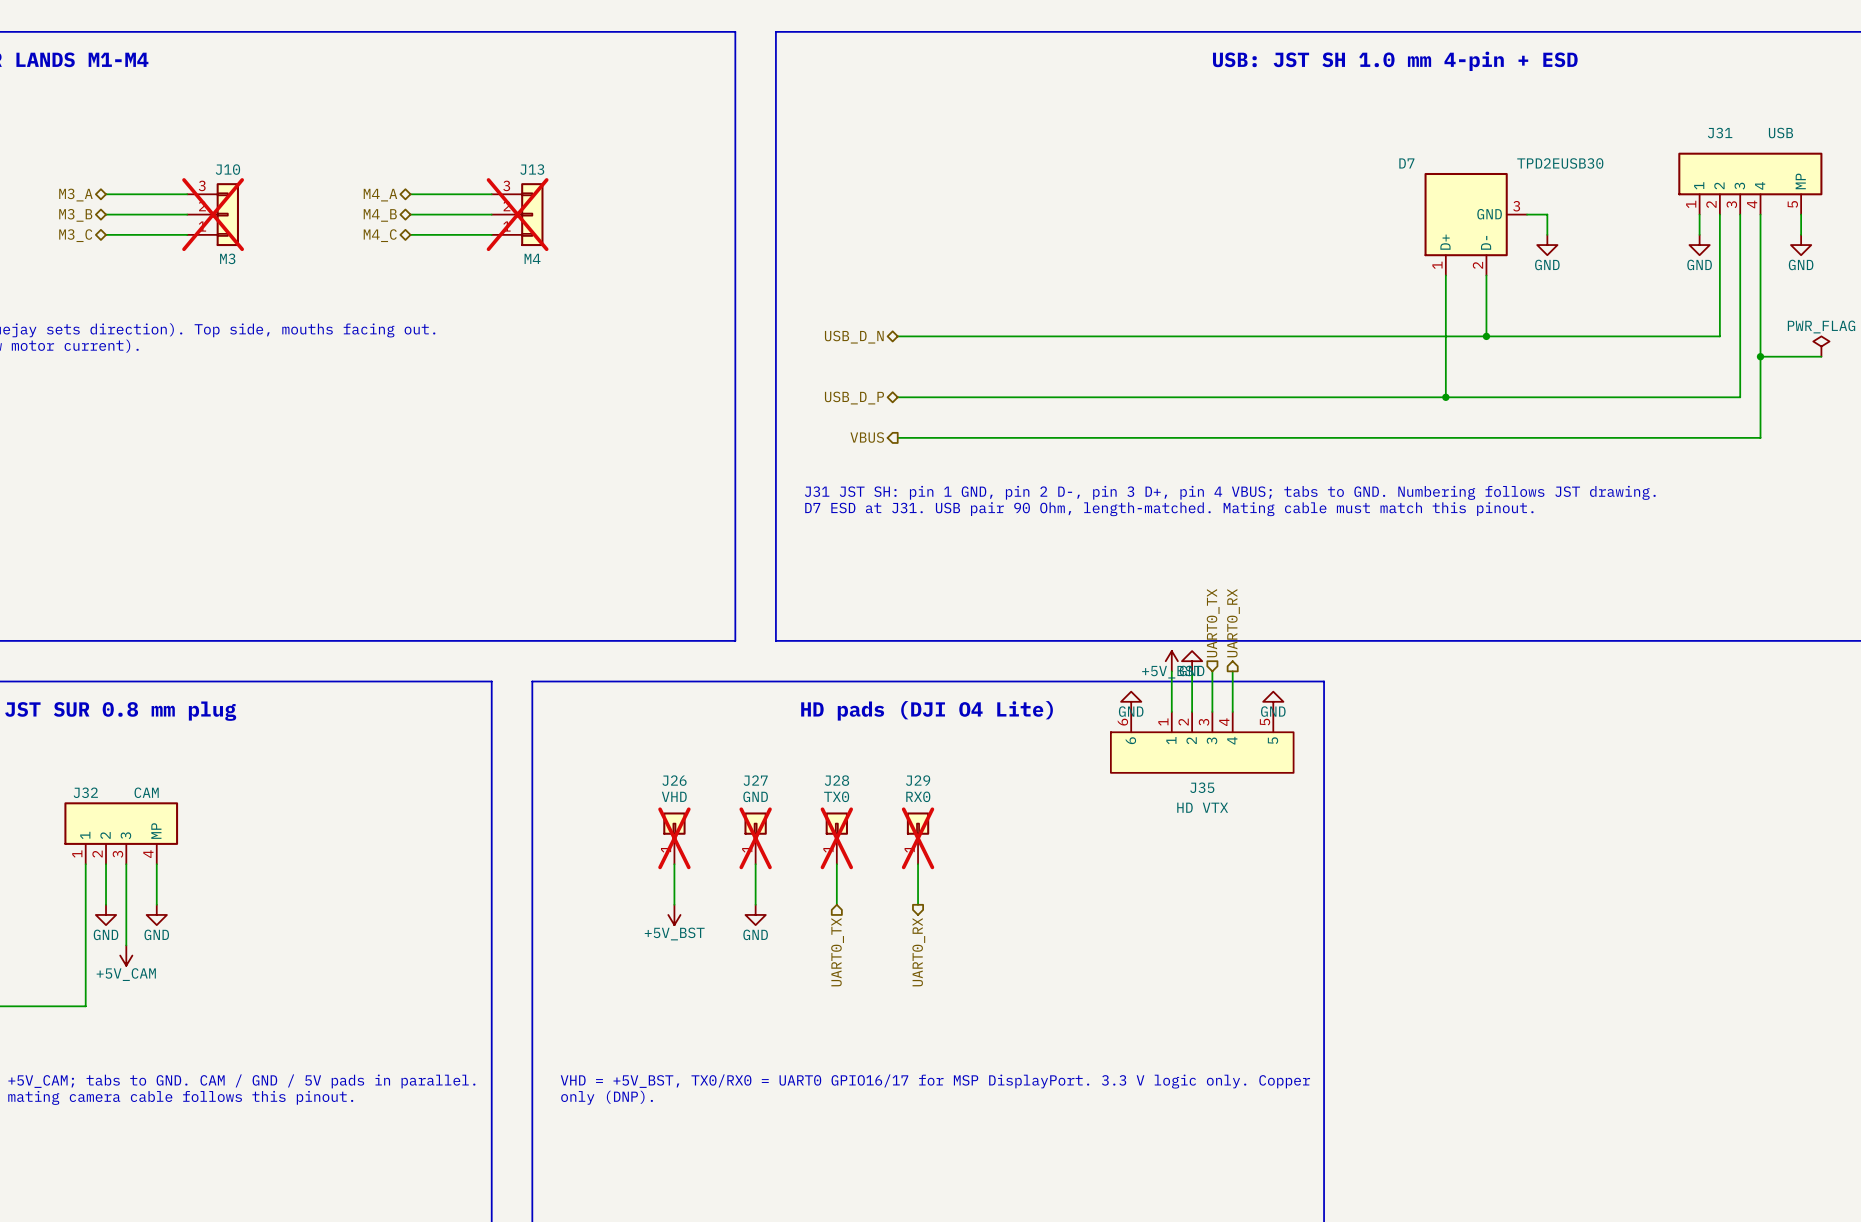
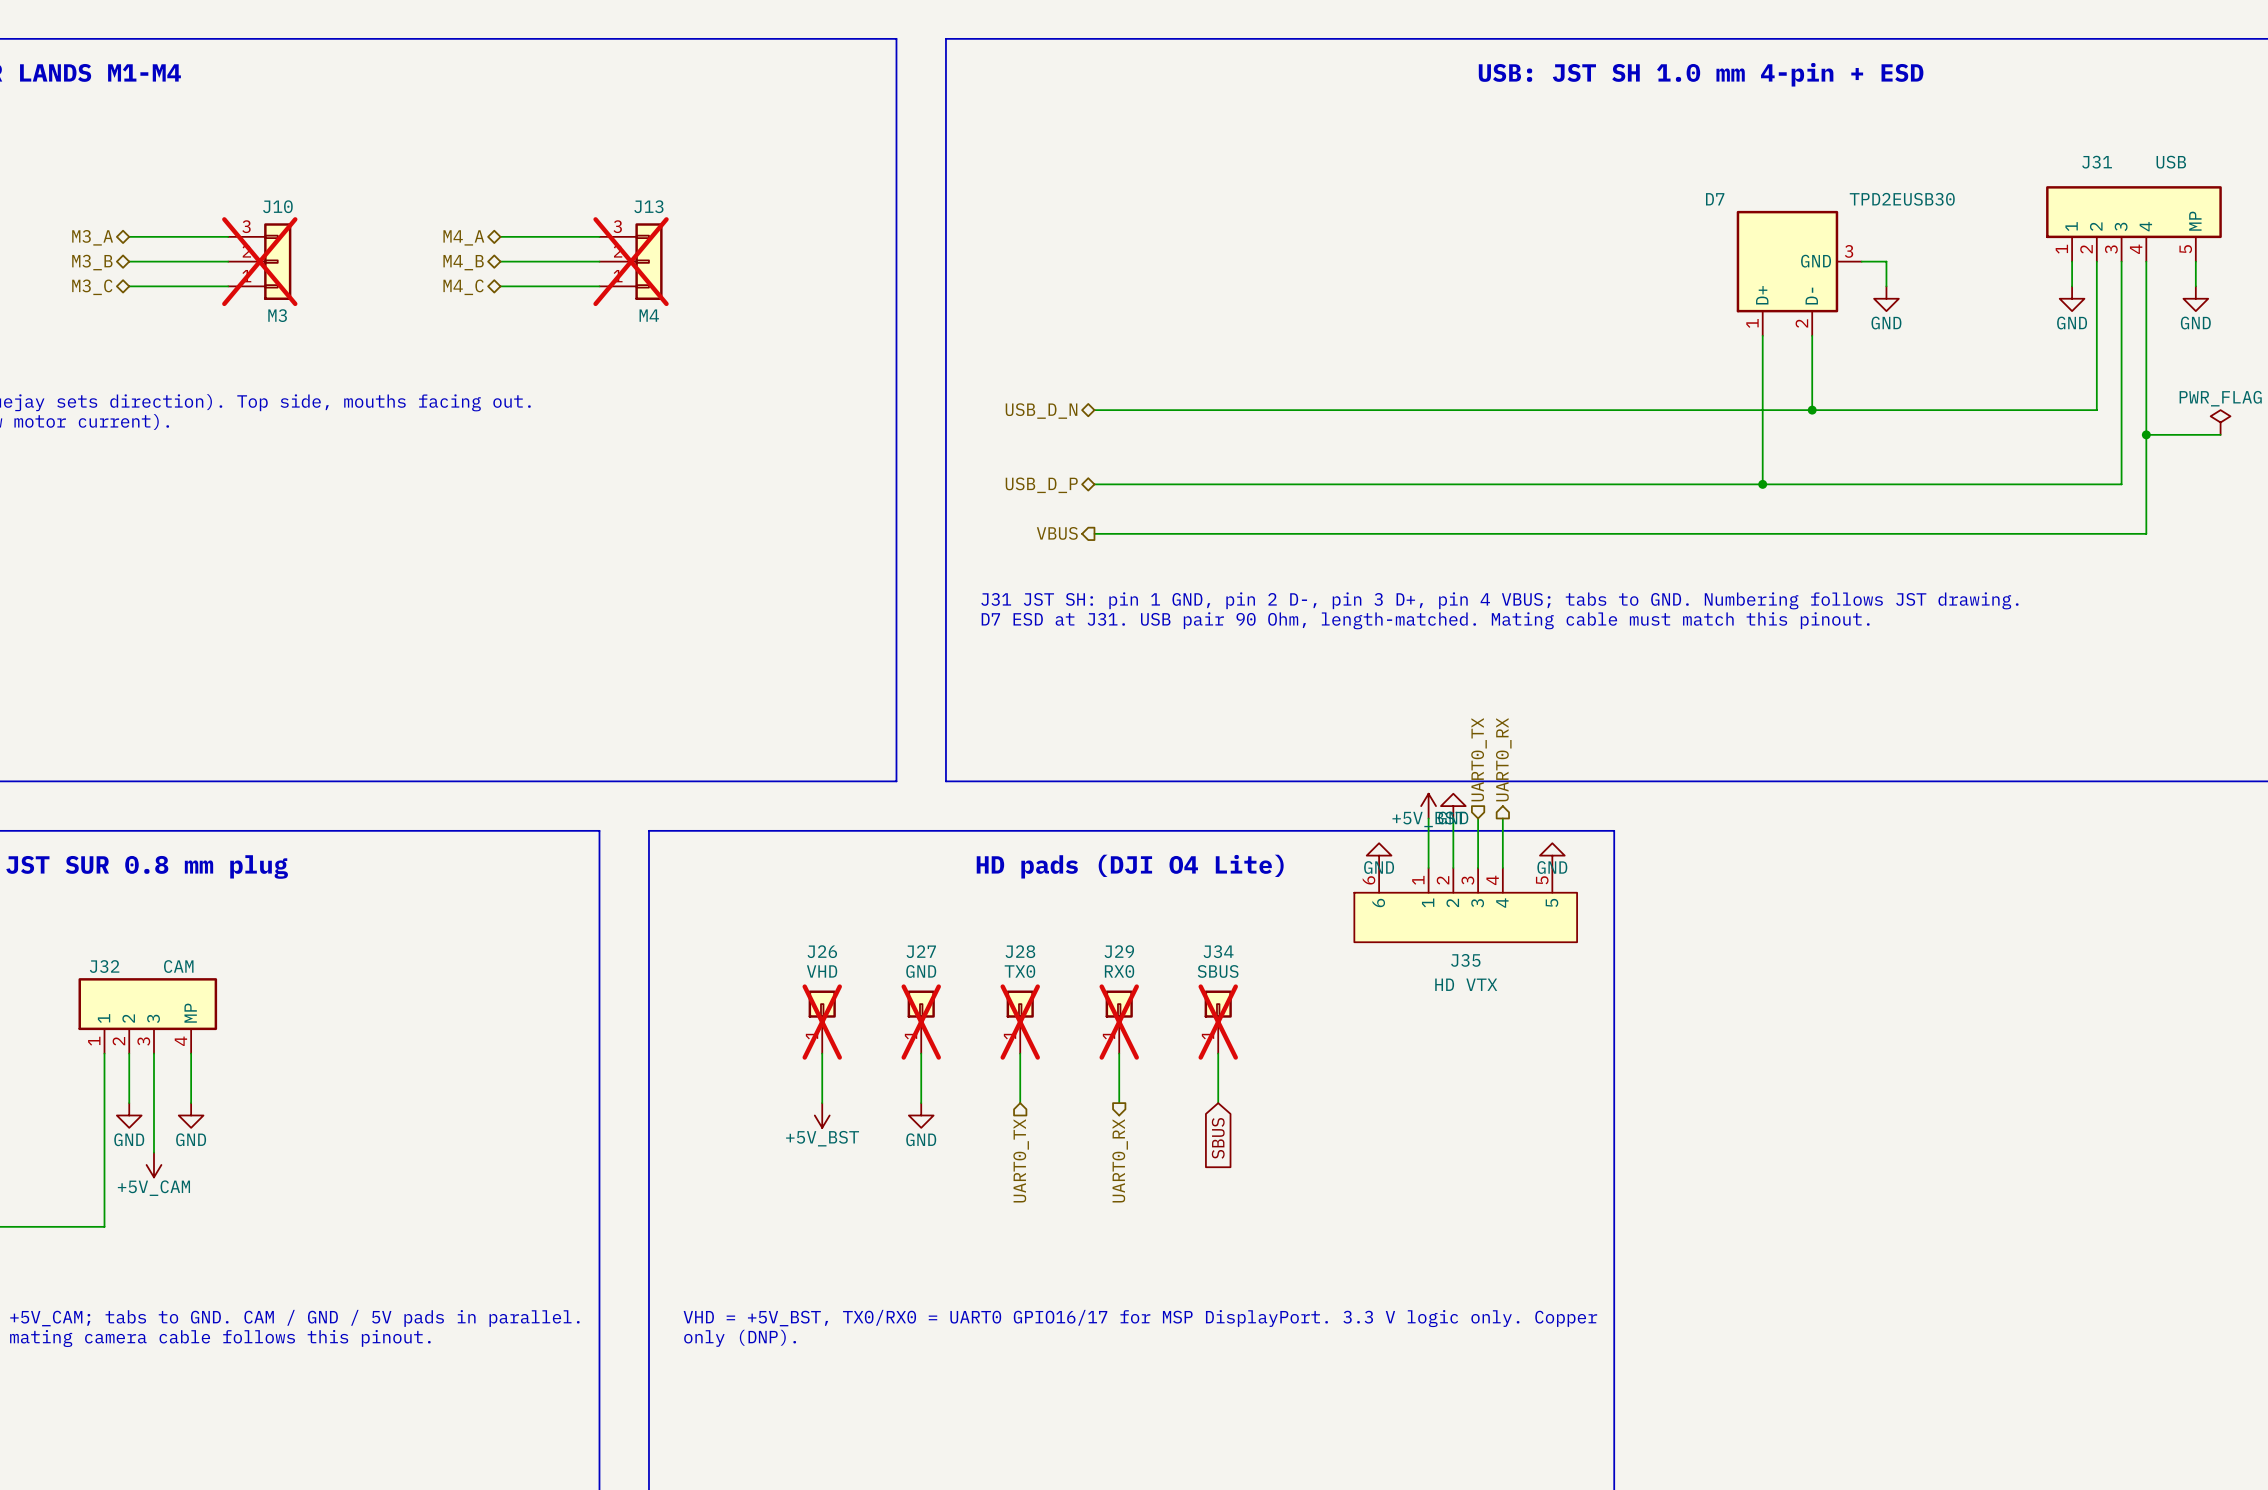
J34: none -> SBUS (1218, 1022)
wire: none -> (1218, 1053) (1218, 1103)
global label: none -> SBUS (1218, 1138)

